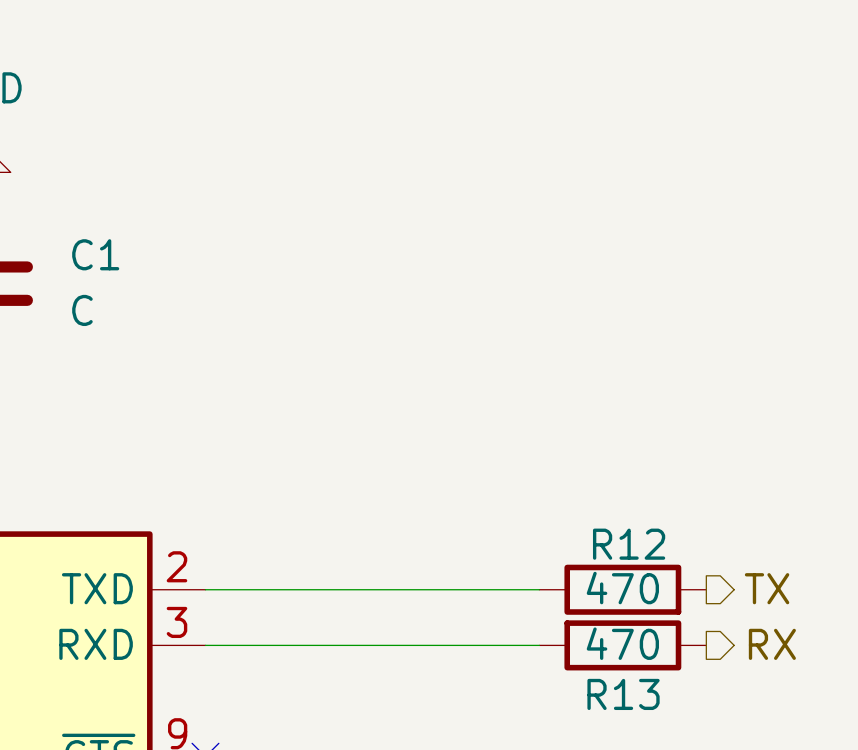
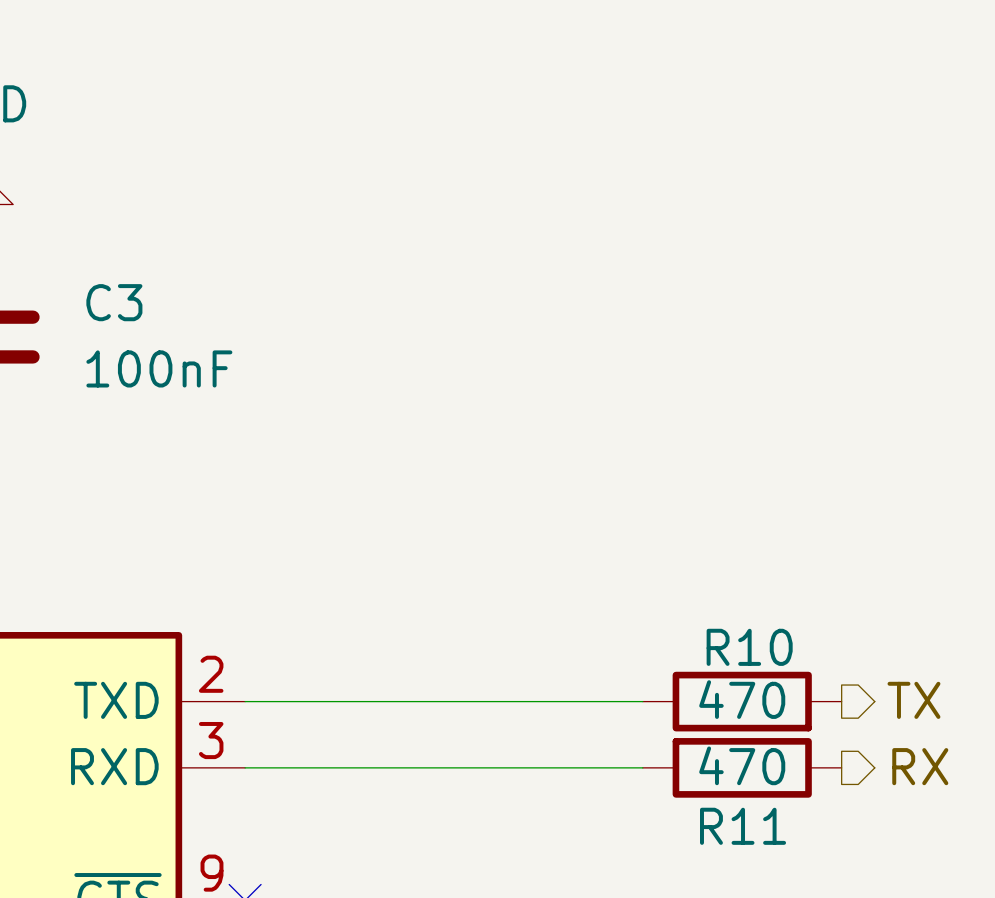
C1 name: C1 (95, 254) -> C3 (114, 302)
C1 value: C (82, 310) -> 100nF (159, 368)
R12 name: R12 (629, 544) -> R10 (749, 647)
R13 name: R13 (623, 694) -> R11 (743, 826)

